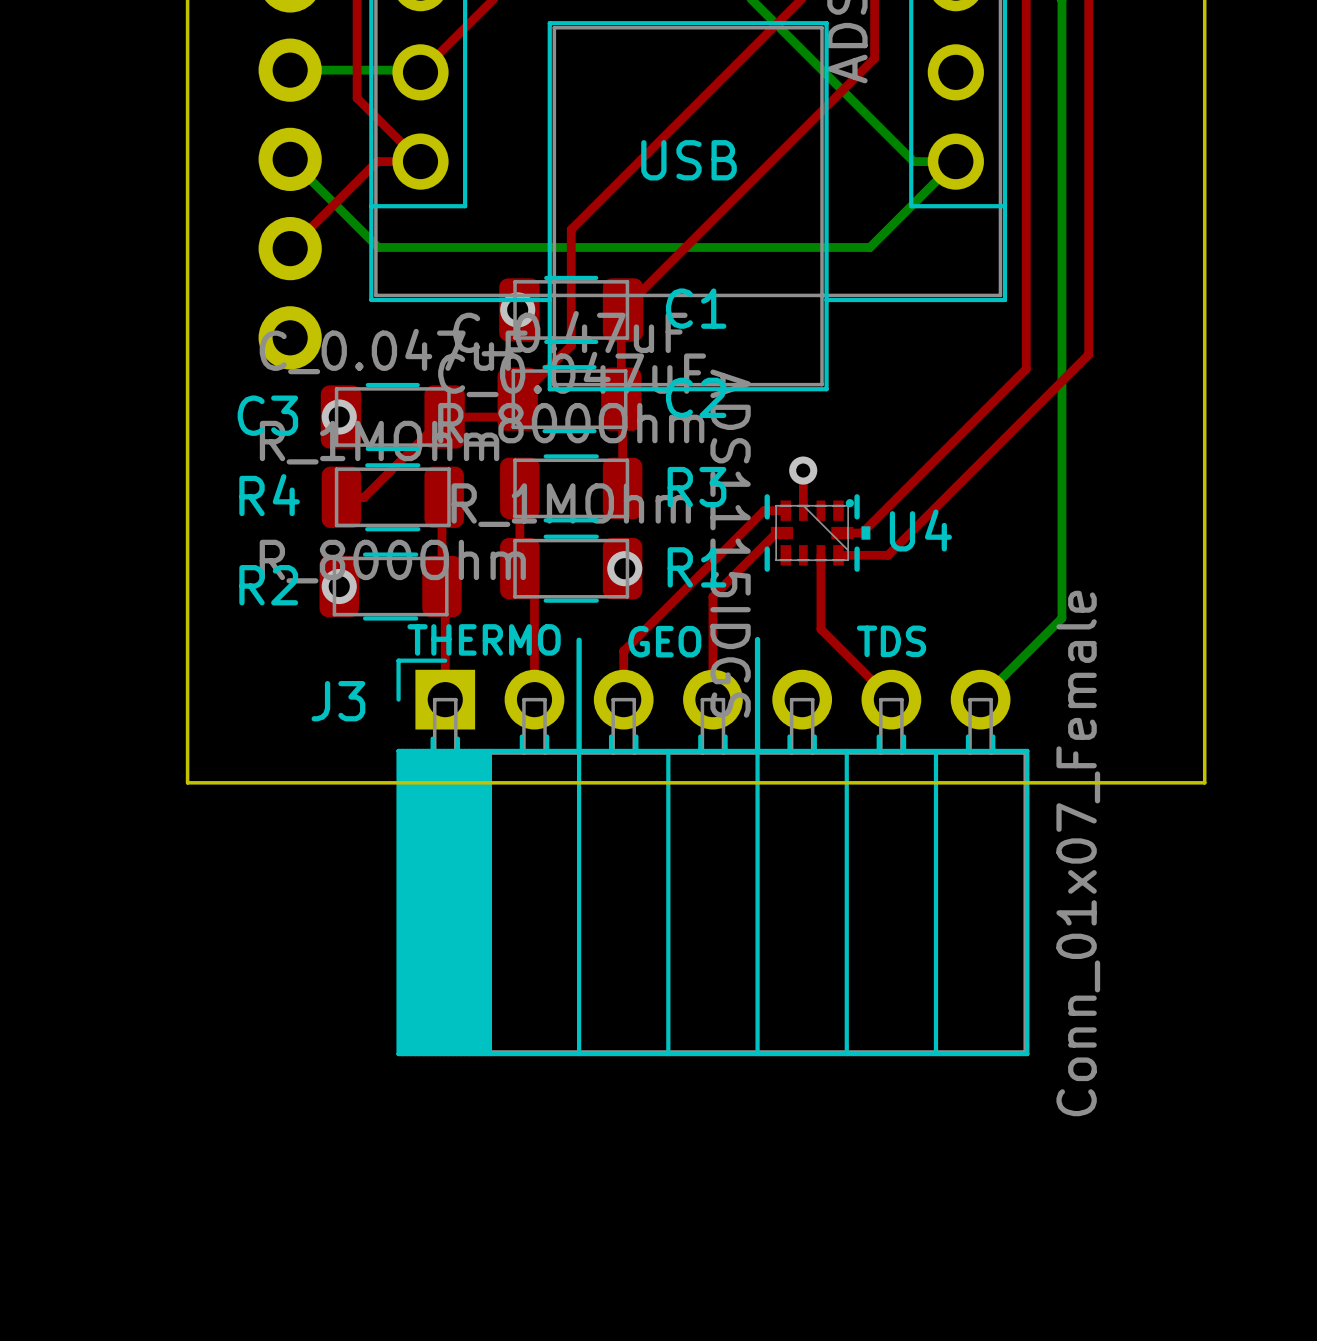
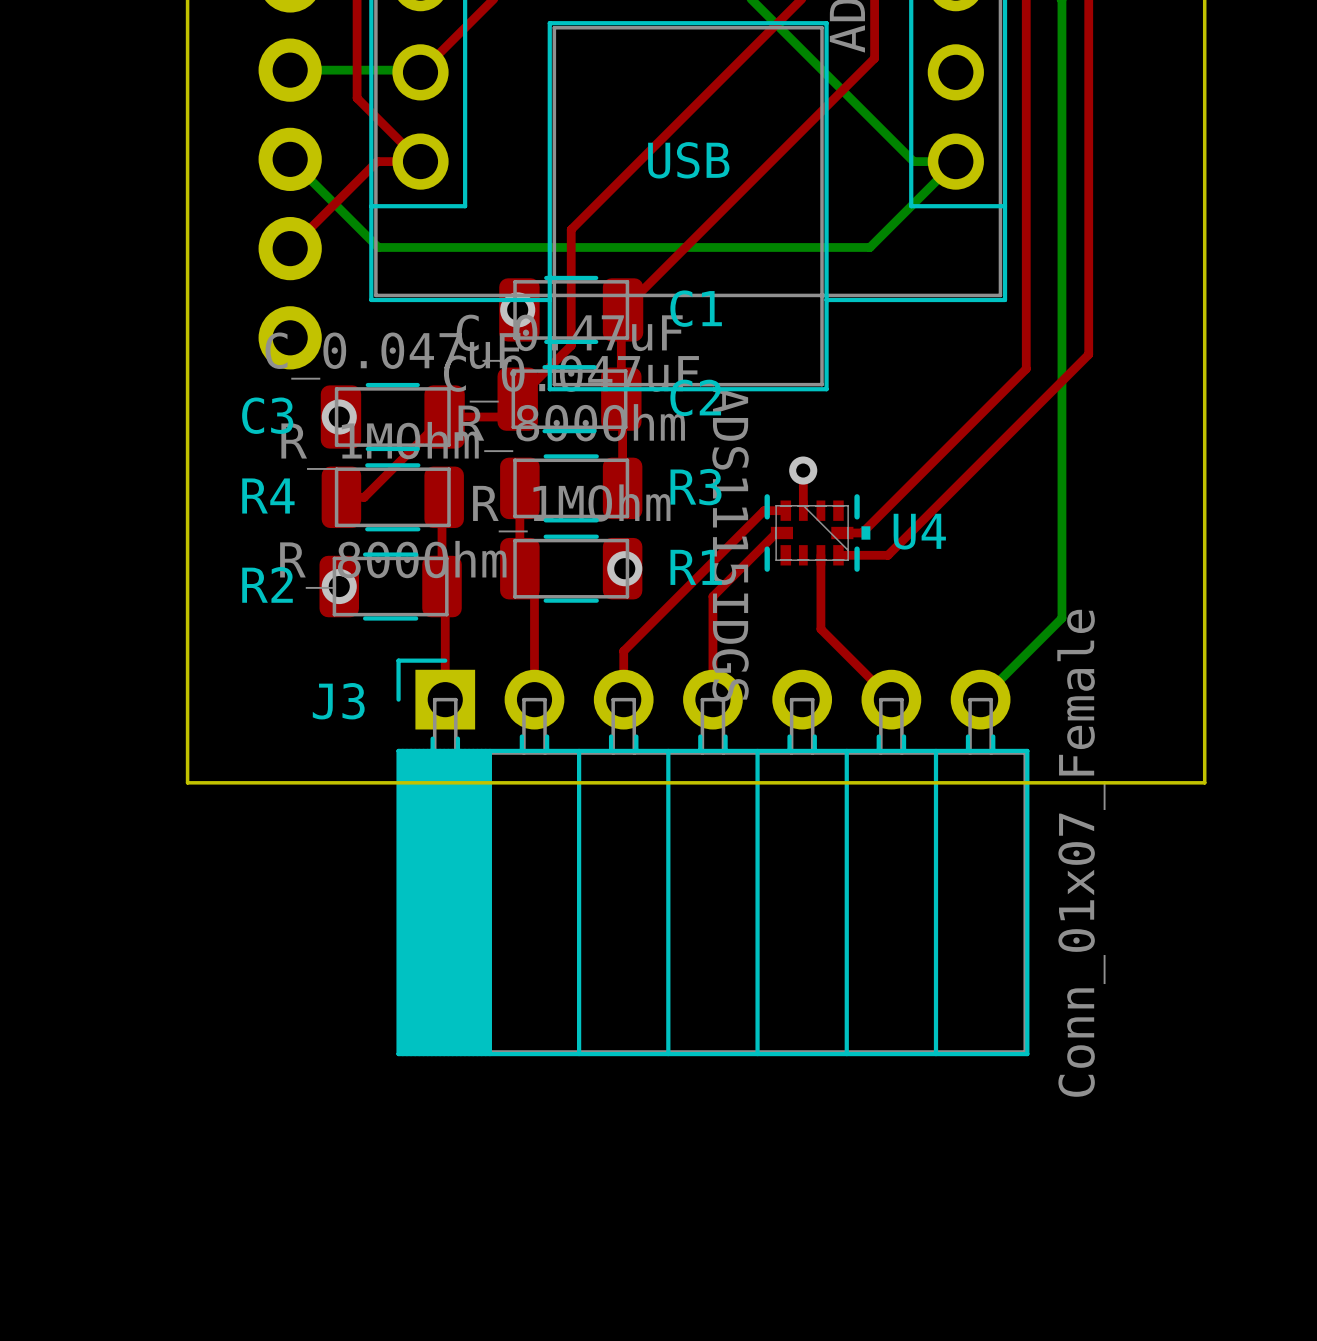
U4 footprint: [764, 494, 871, 572] -> [764, 494, 871, 572]
text: THERMO (484, 639) -> none
line: (757, 639) (757, 750) -> none
line: (579, 640) (579, 749) -> none
text: GEO (664, 641) -> none
text: TDS (891, 641) -> none

